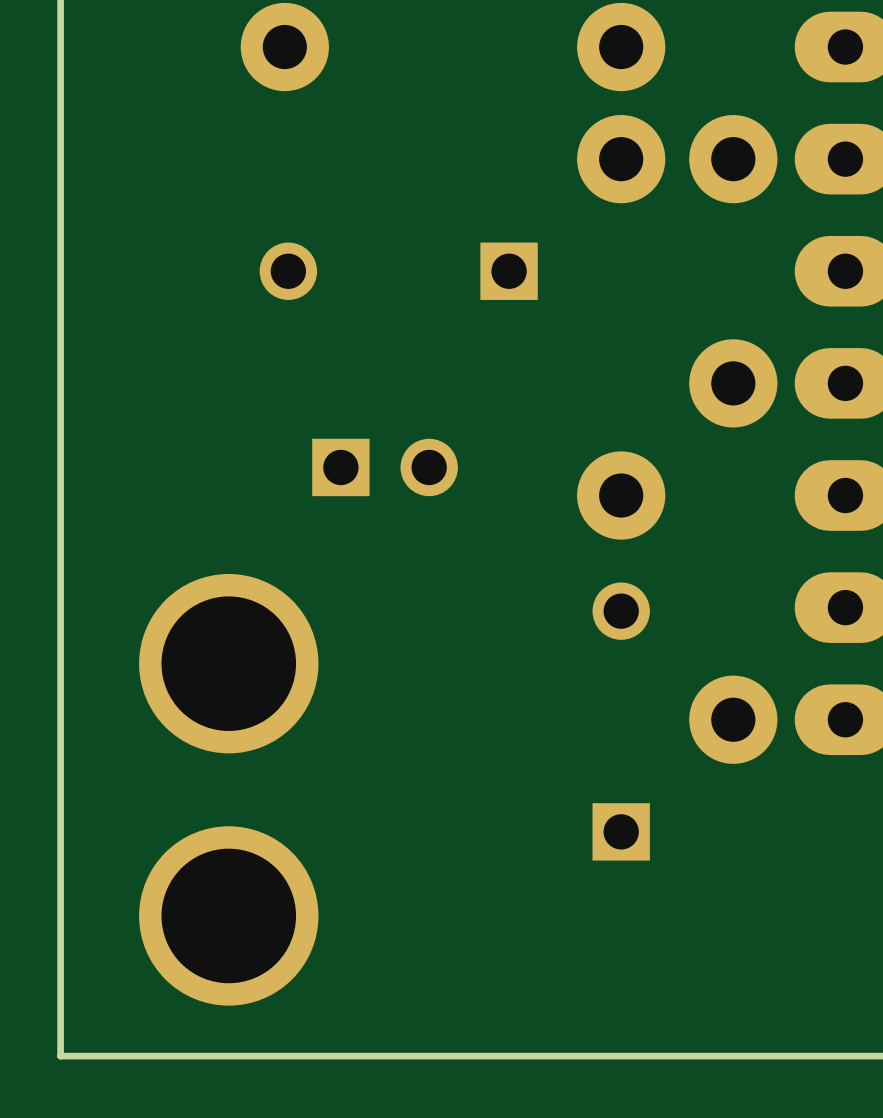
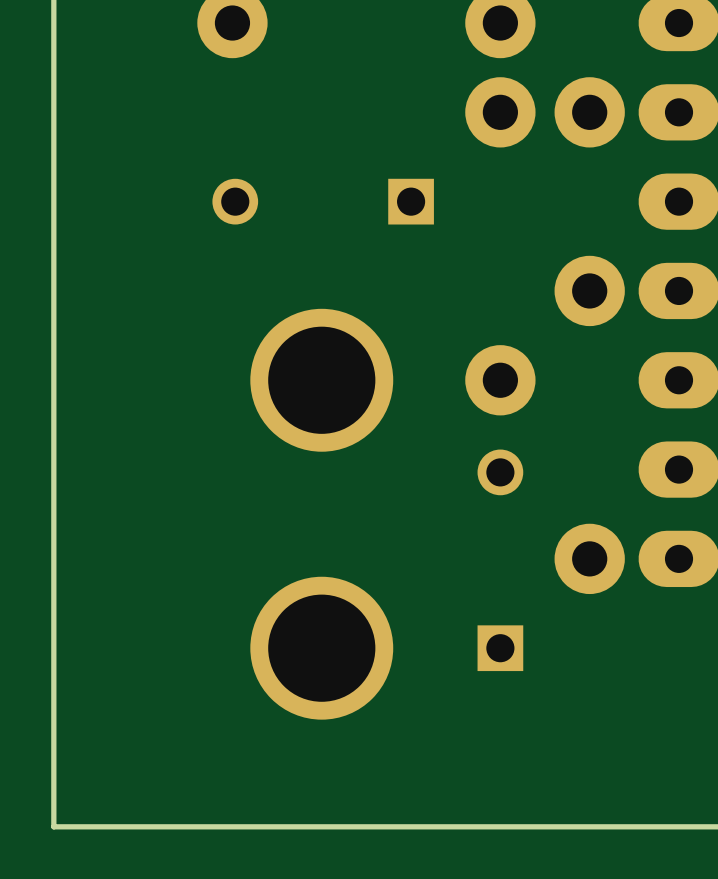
part footprint: [312, 438, 458, 497] -> [250, 308, 394, 452]
part: (228, 663) -> none
part: none -> (321, 648)
part: (228, 915) -> none

